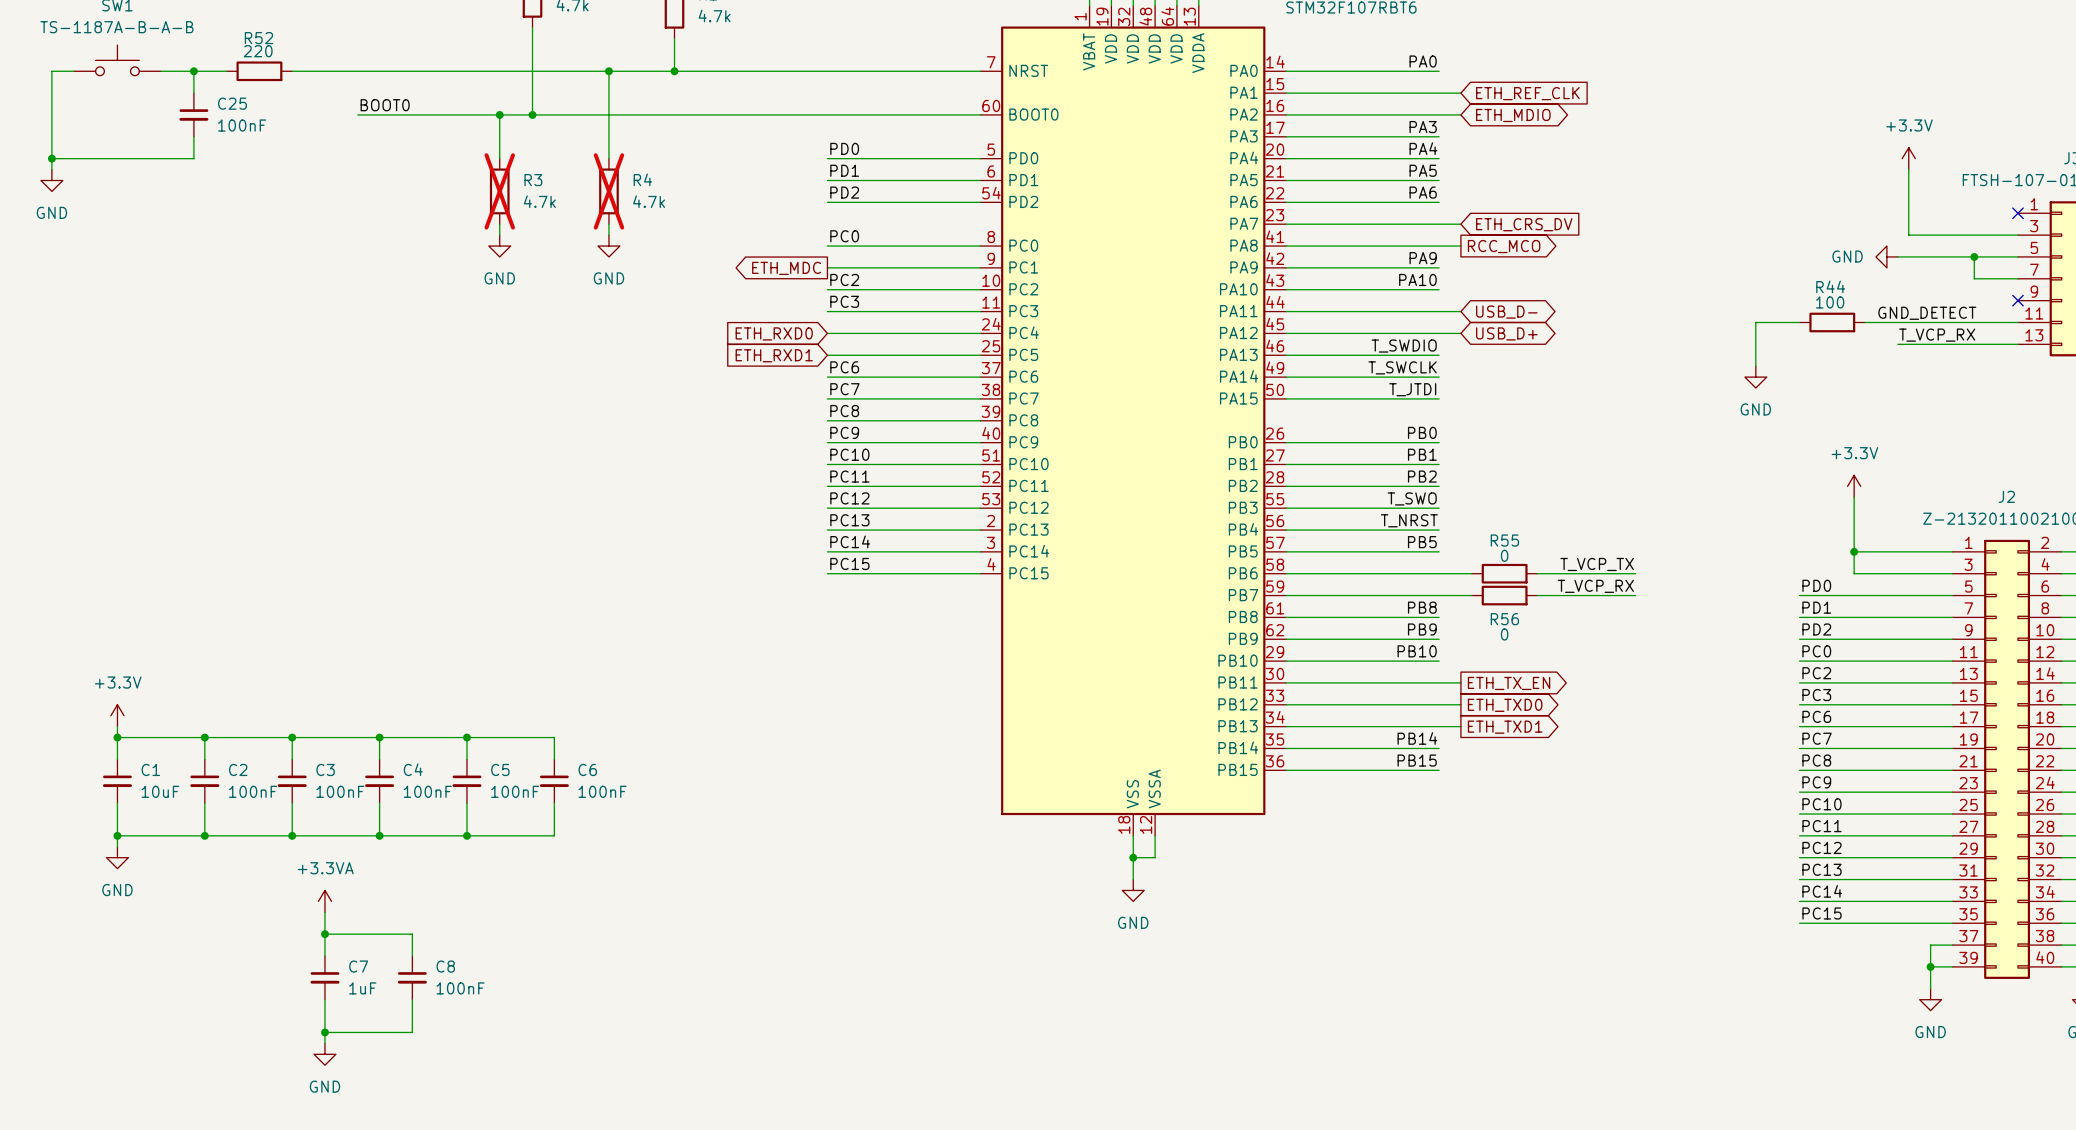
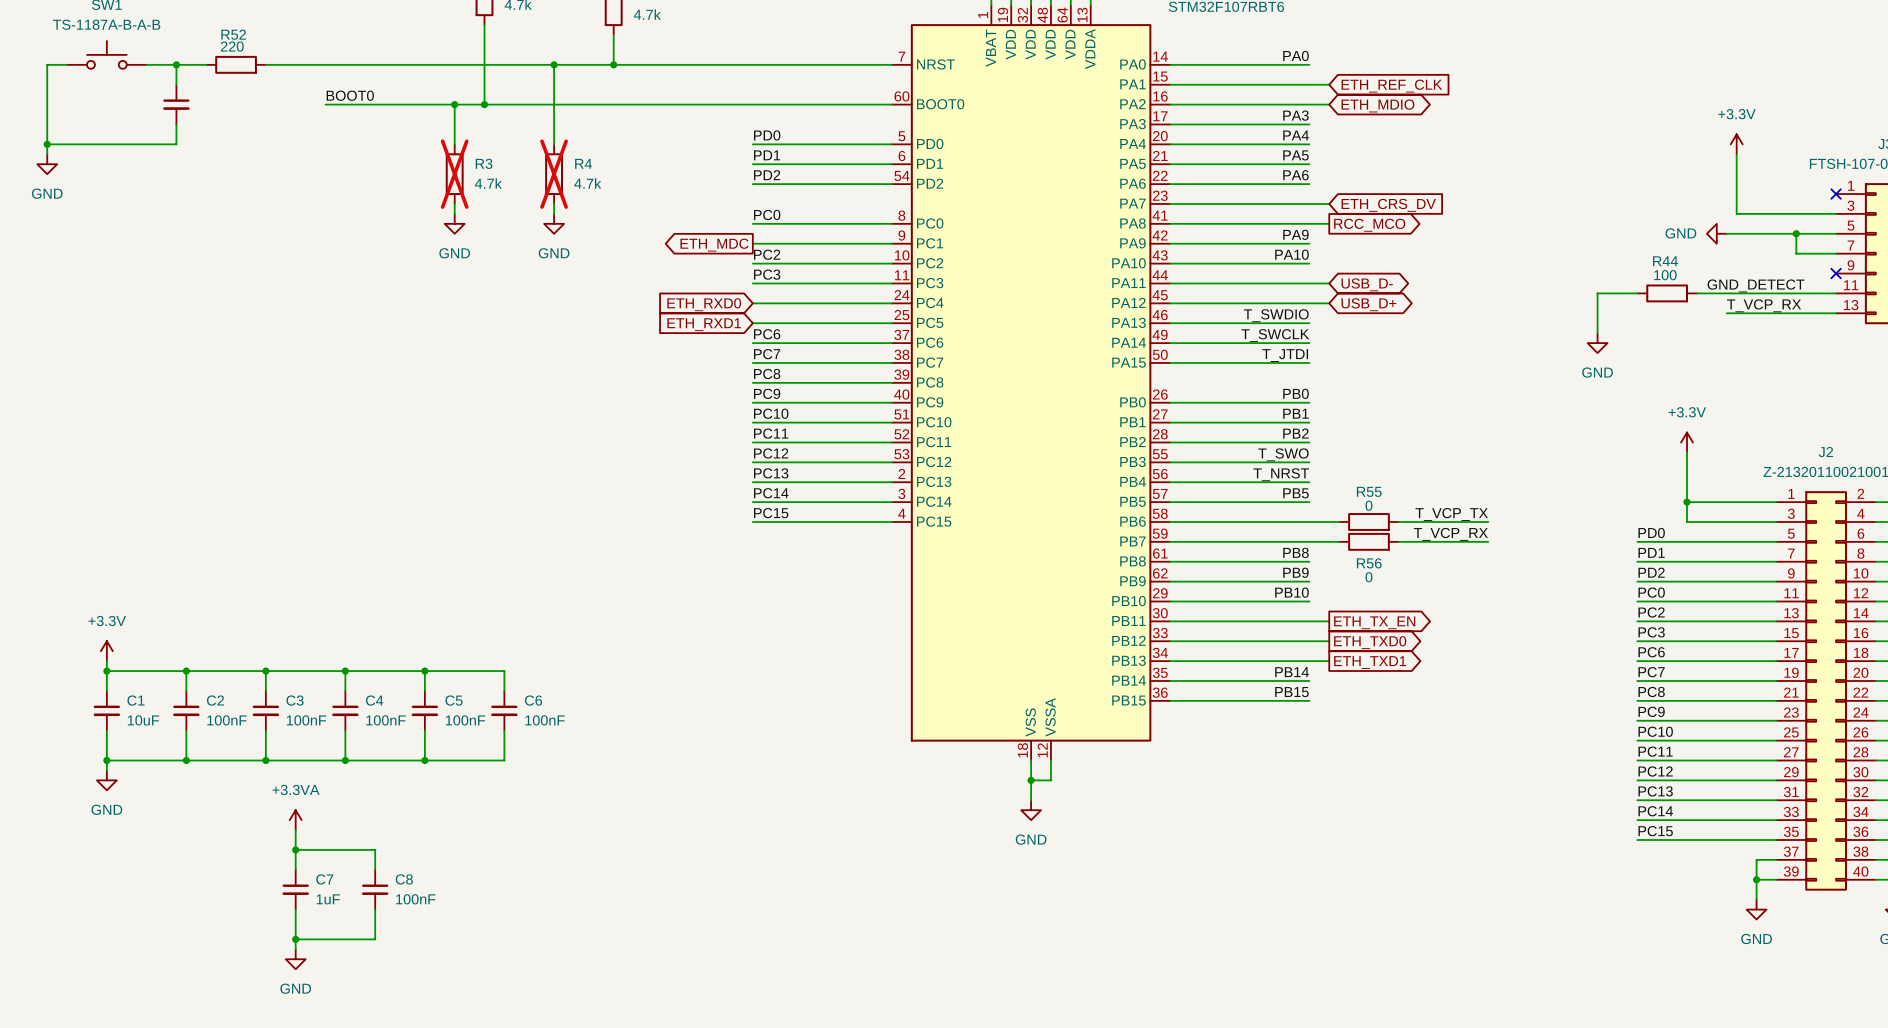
C25 name: C25 (232, 103) -> none
C25 value: 100nF (242, 125) -> none

